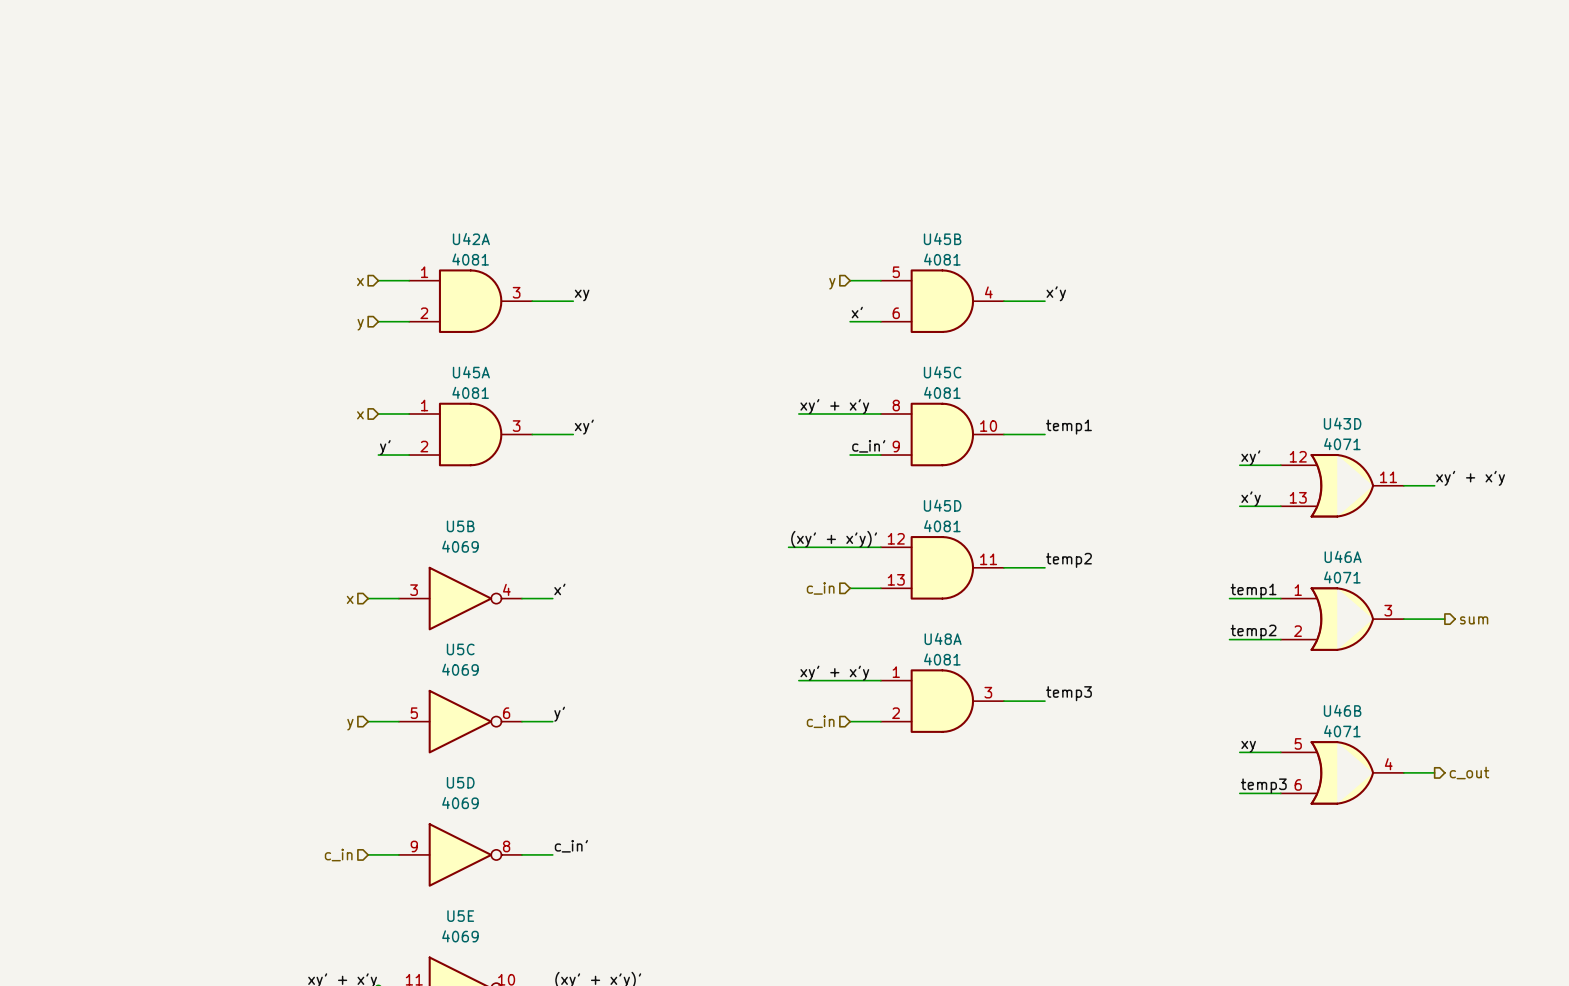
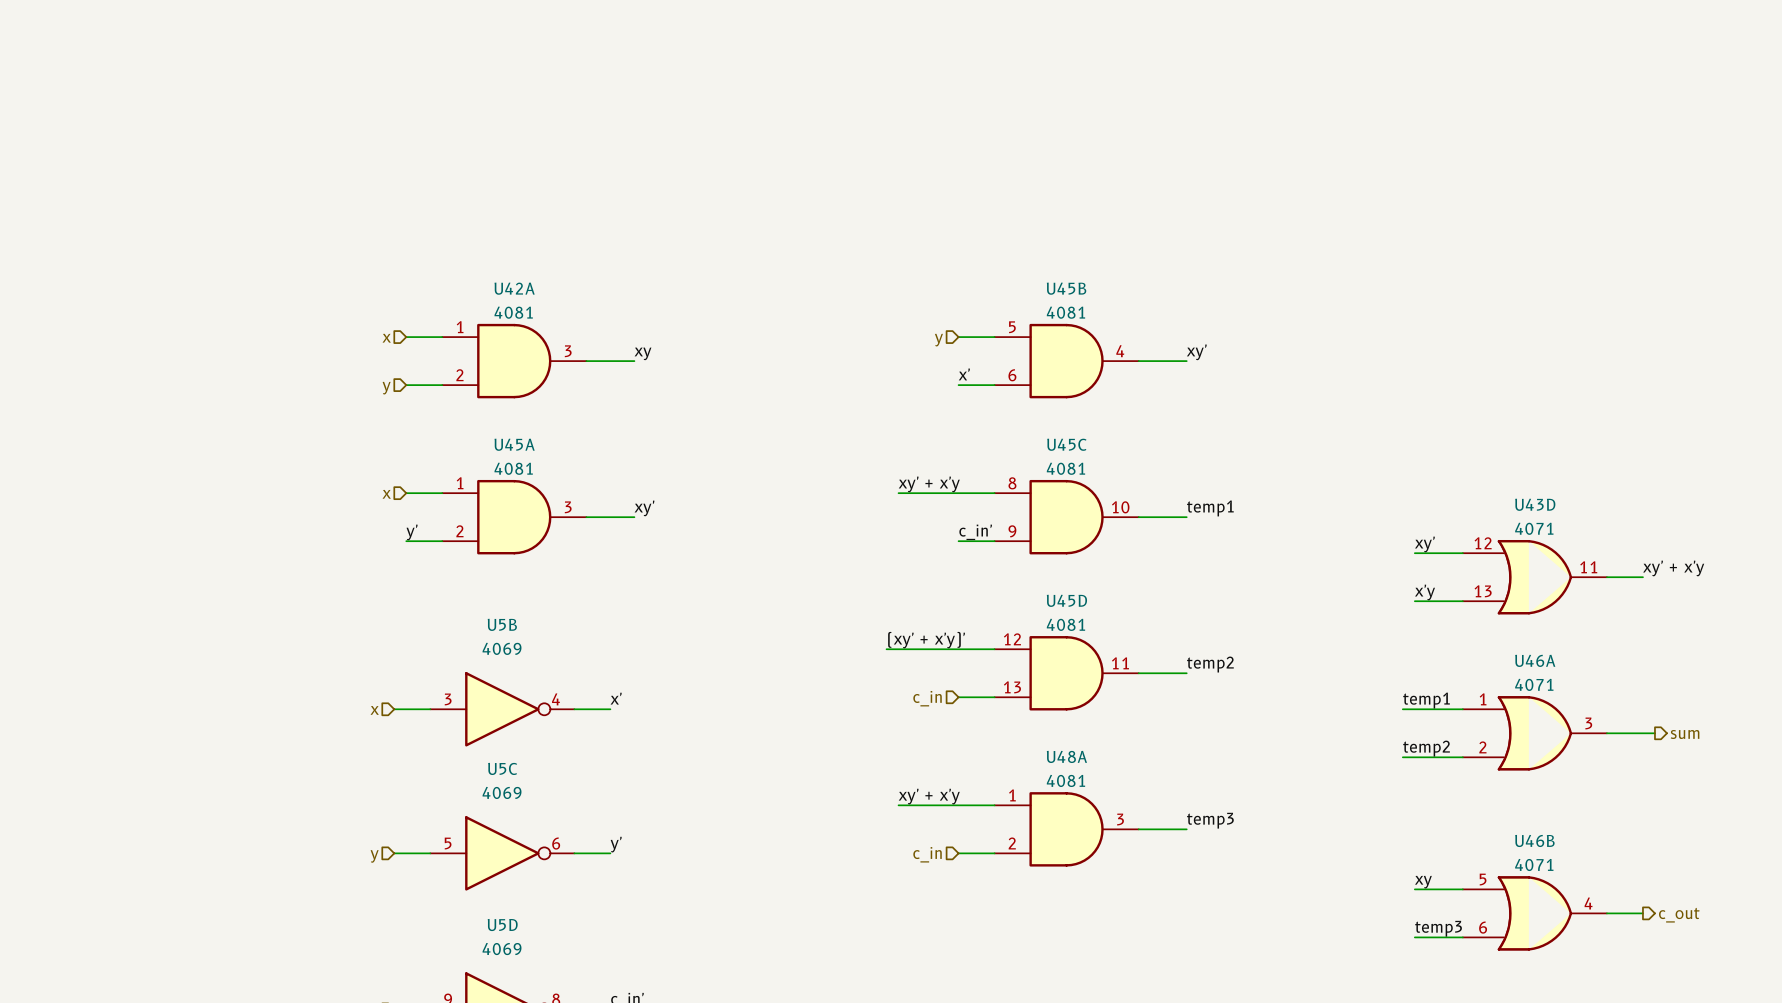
label: x'y (1056, 293) -> xy' (1196, 352)

